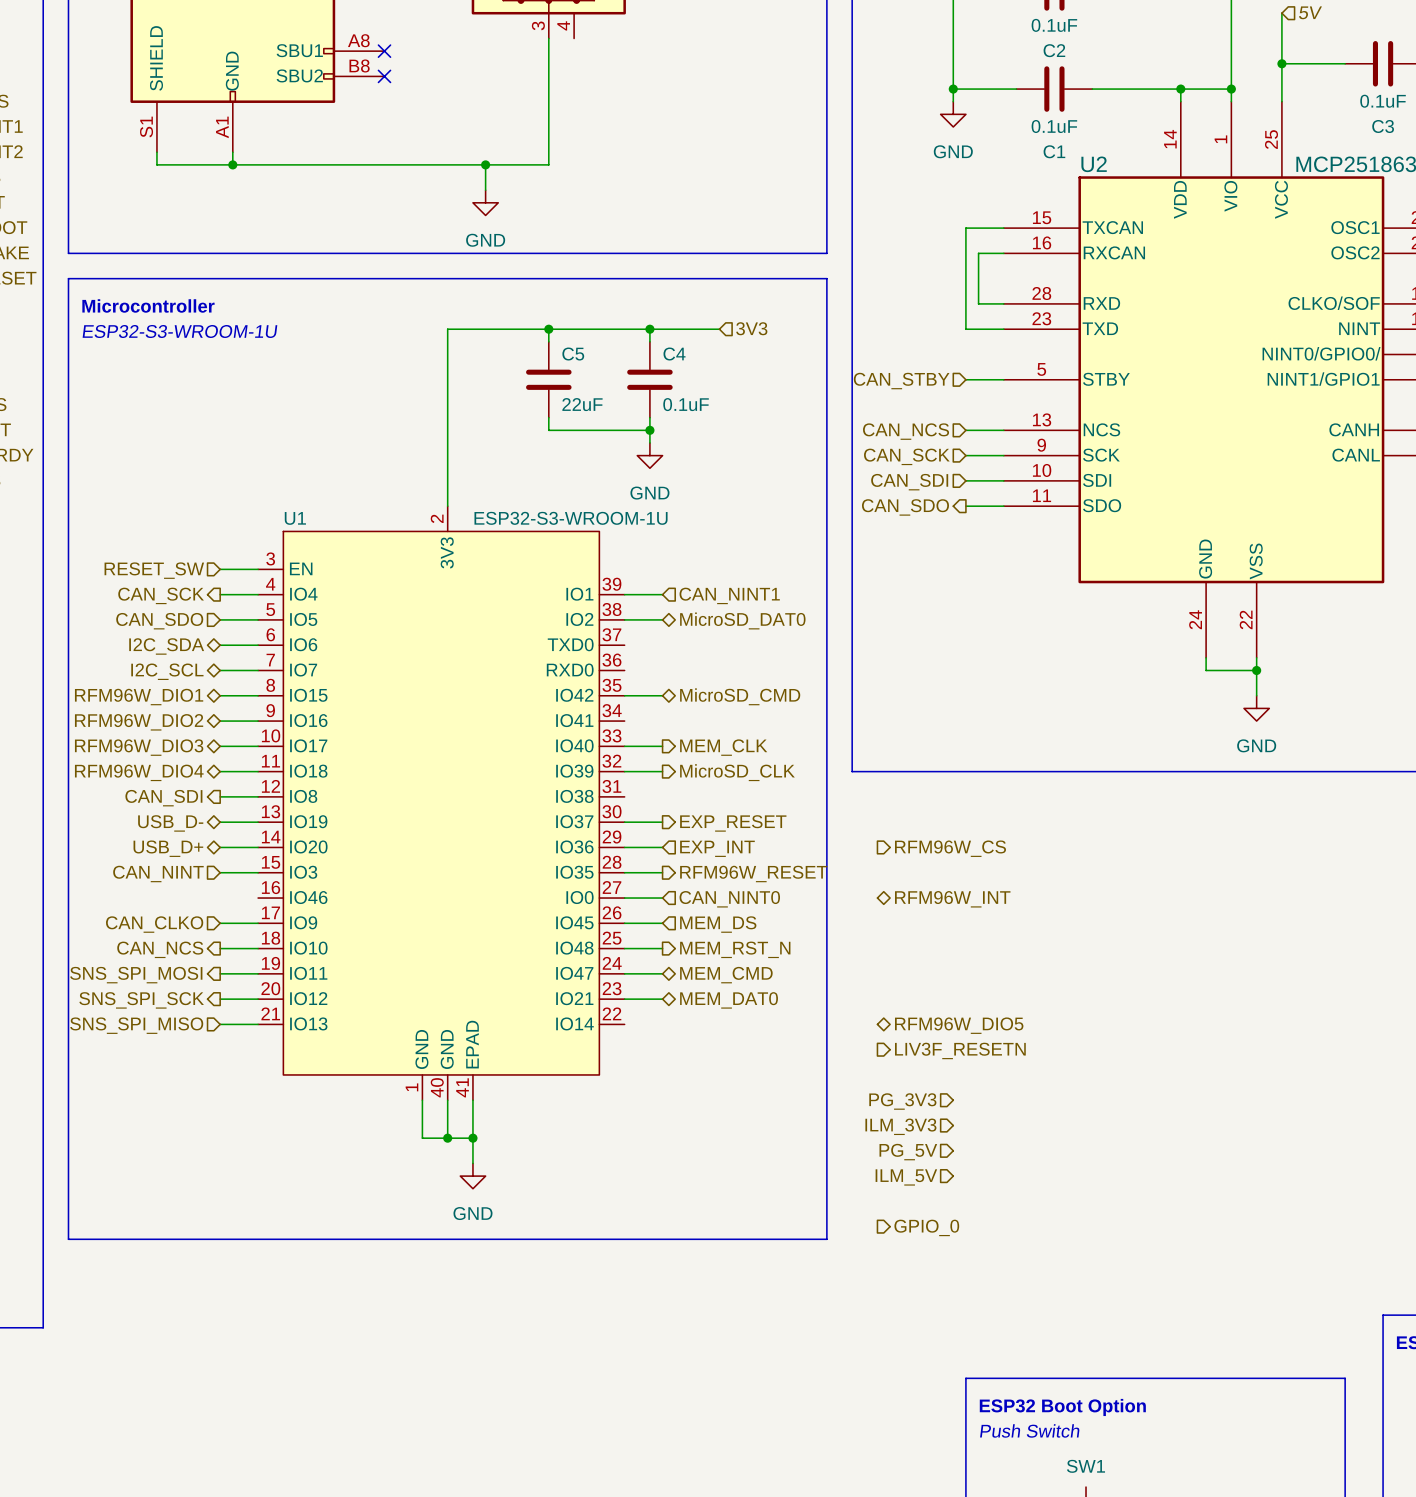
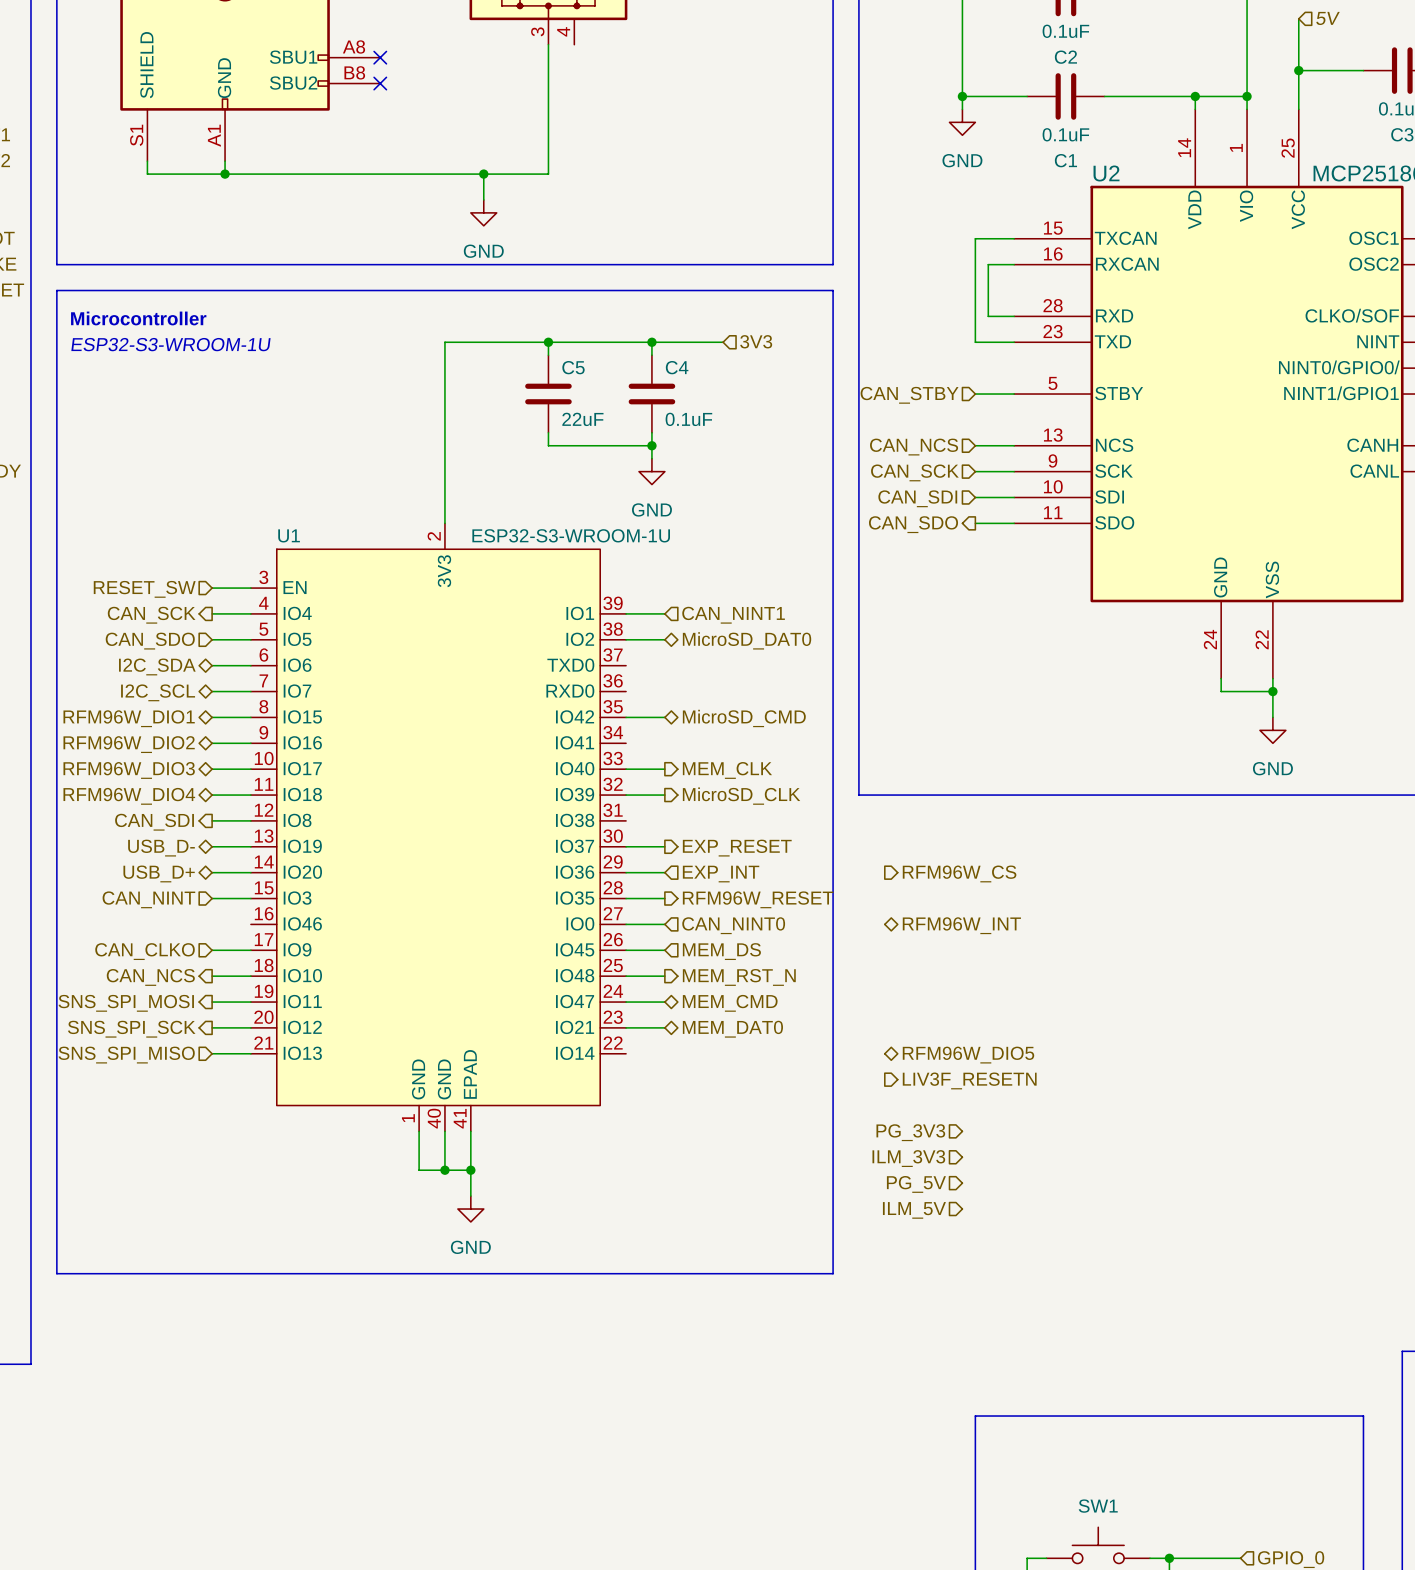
hierarchical label: GPIO_0 (926, 1227) -> none
text: ESP32 Boot Option (1062, 1407) -> none
text: Push Switch (1029, 1430) -> none

